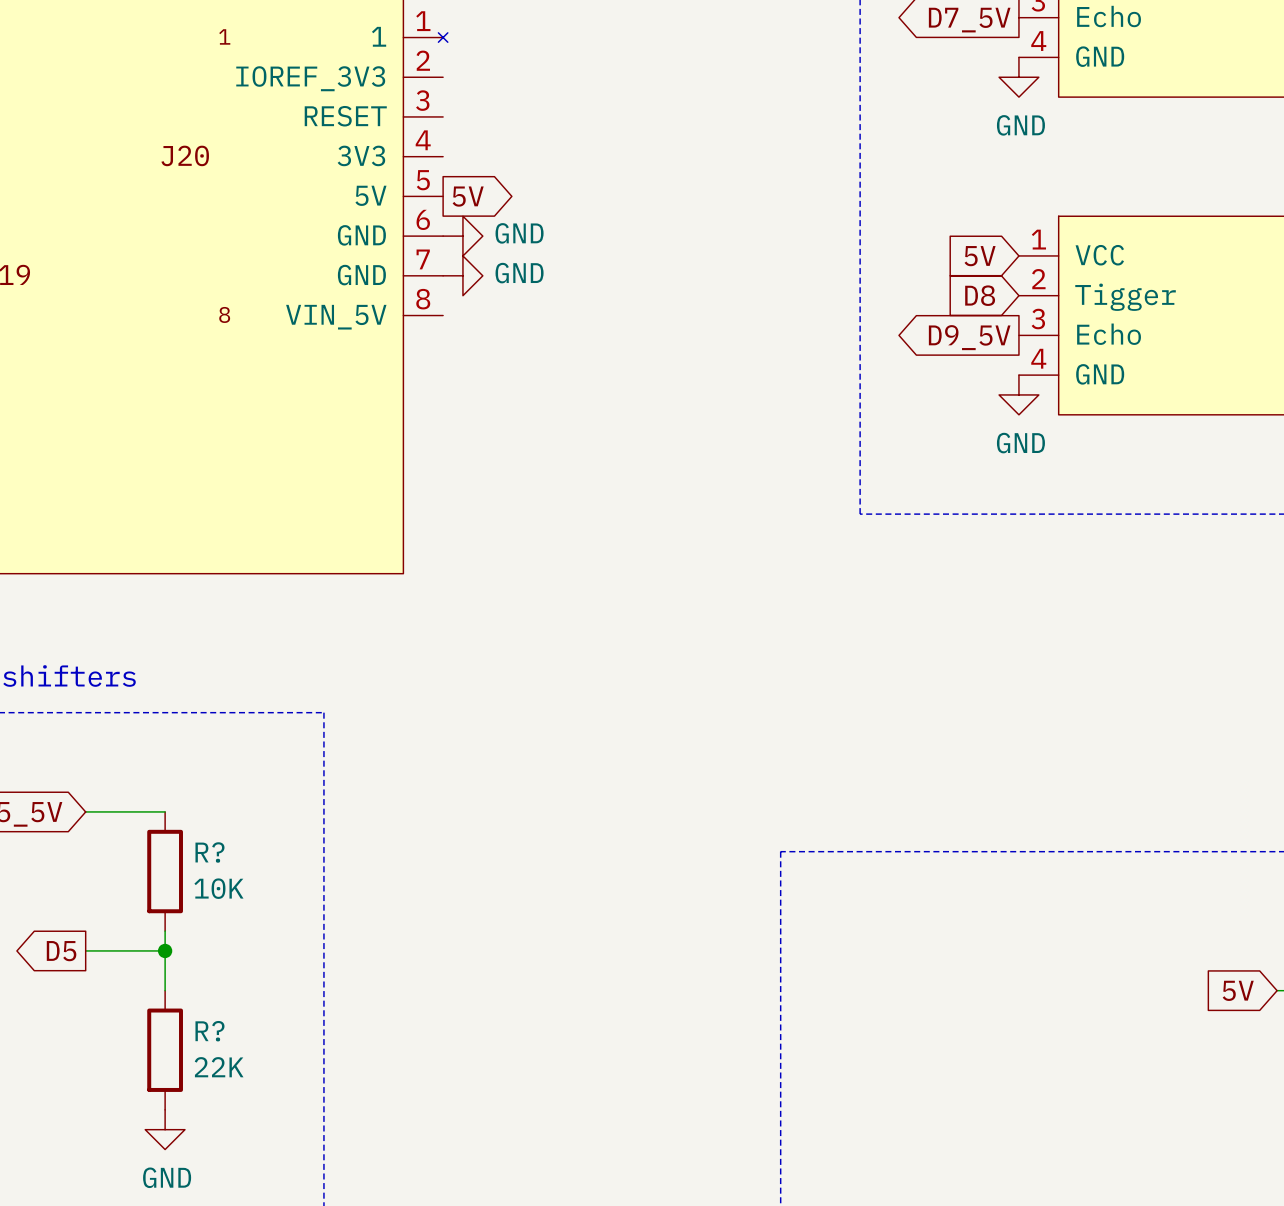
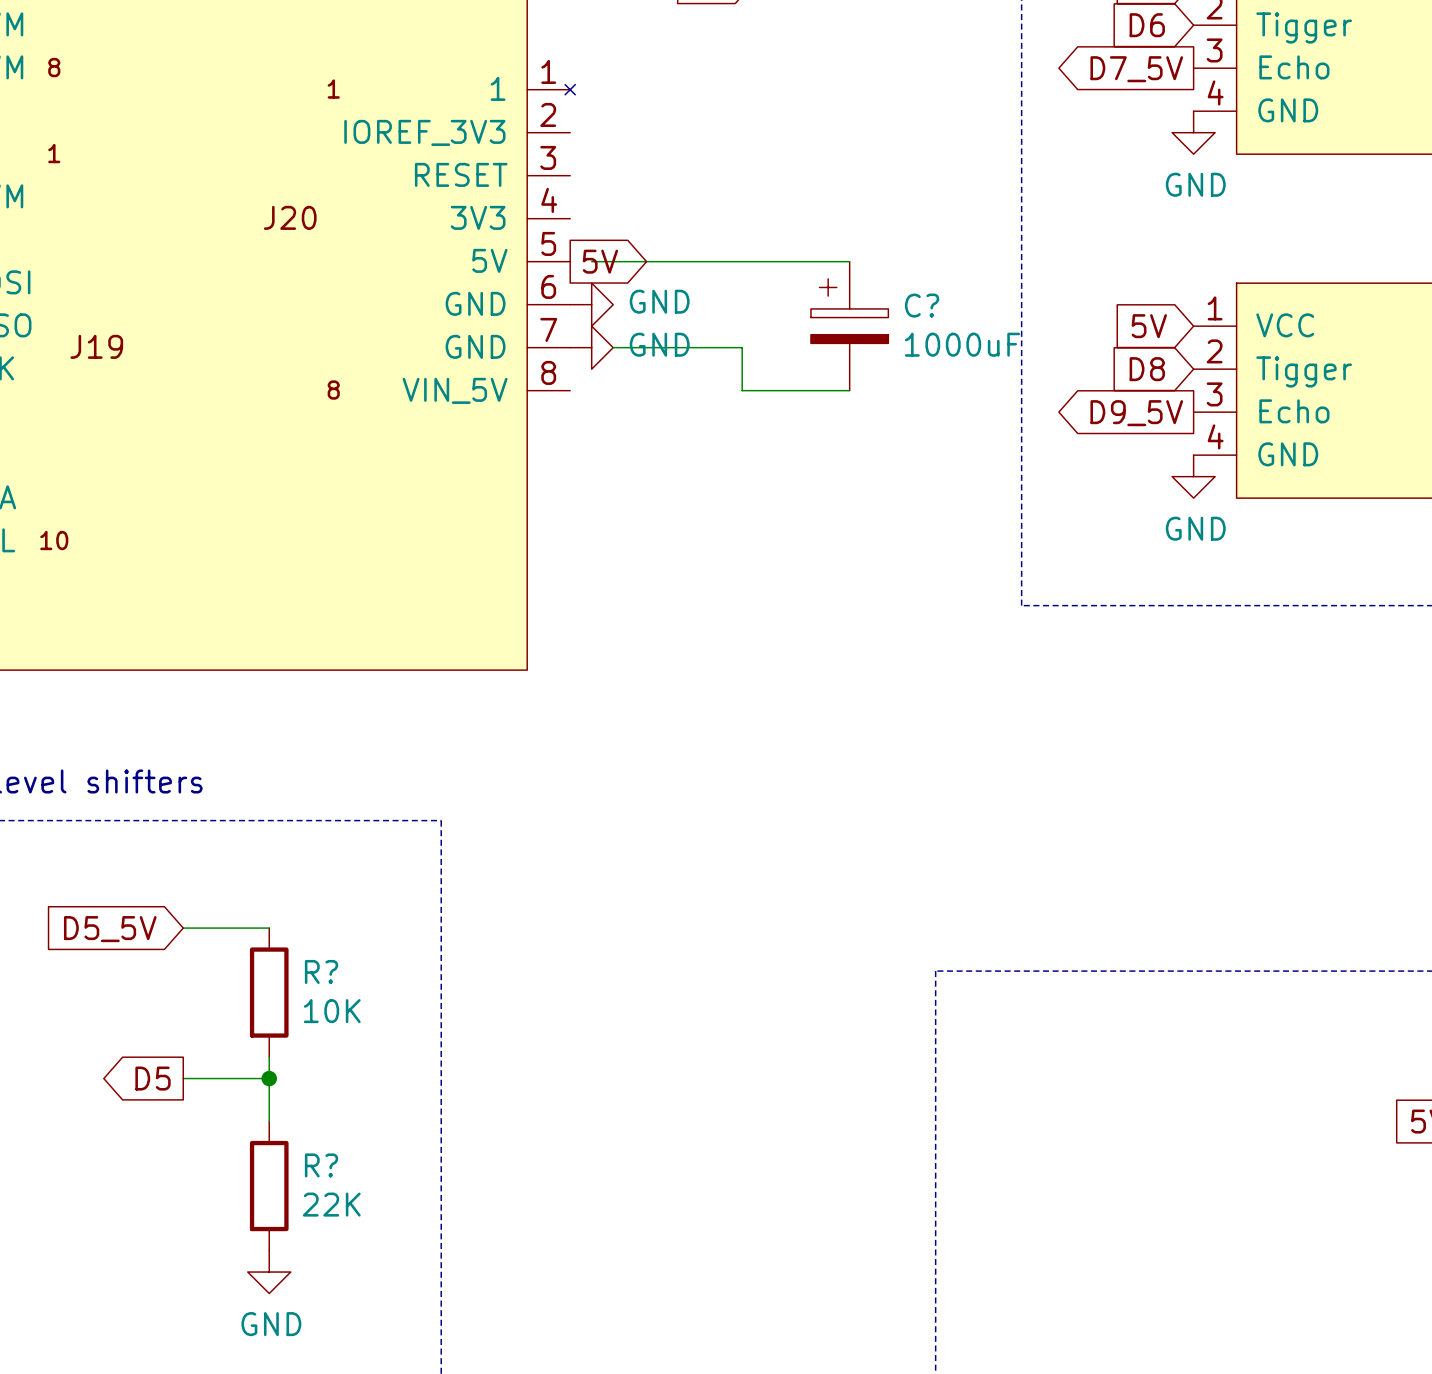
wire: none -> (591, 261) (849, 261)
C?: none -> 1000uF (849, 326)
wire: none -> (613, 347) (742, 347) (742, 390) (849, 390)

